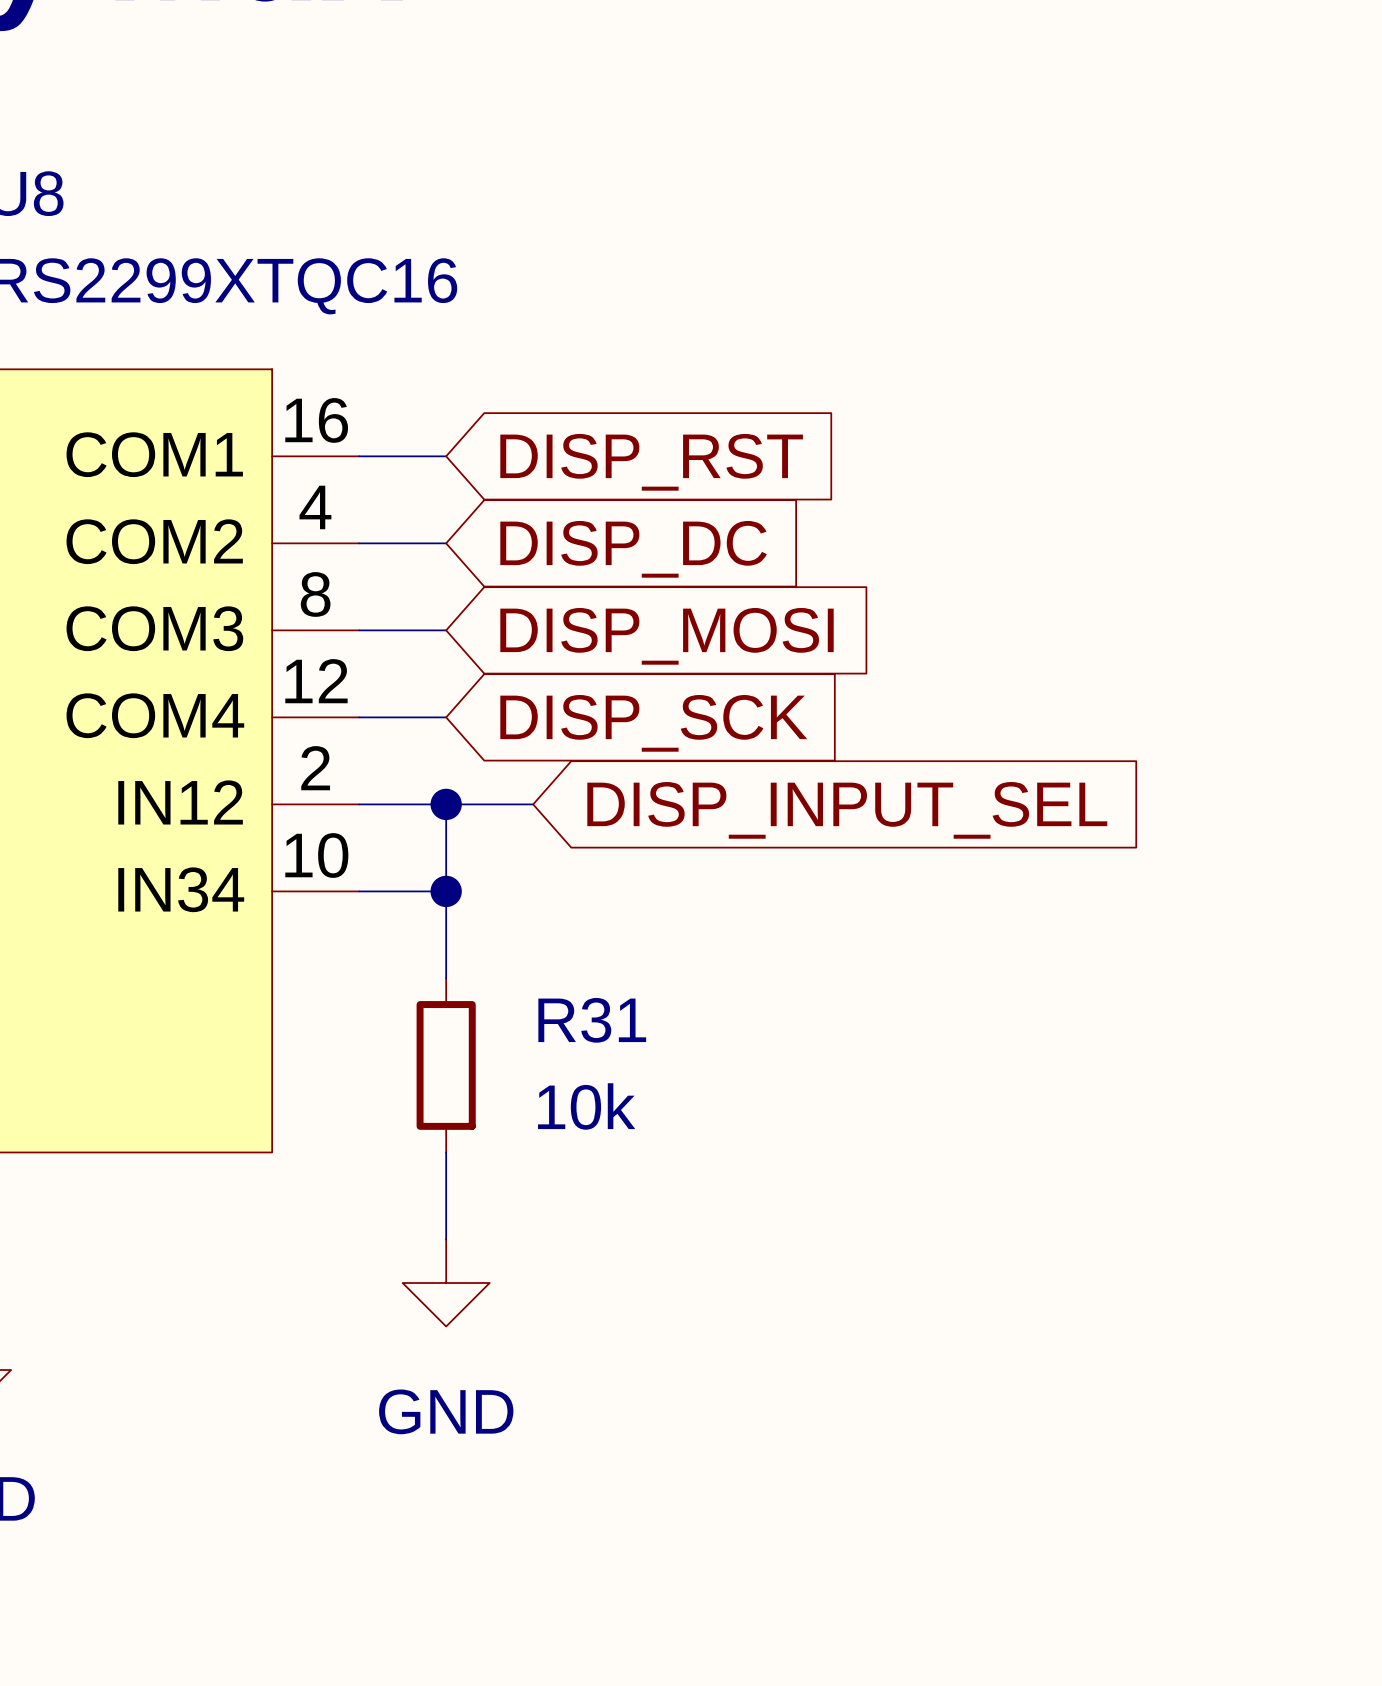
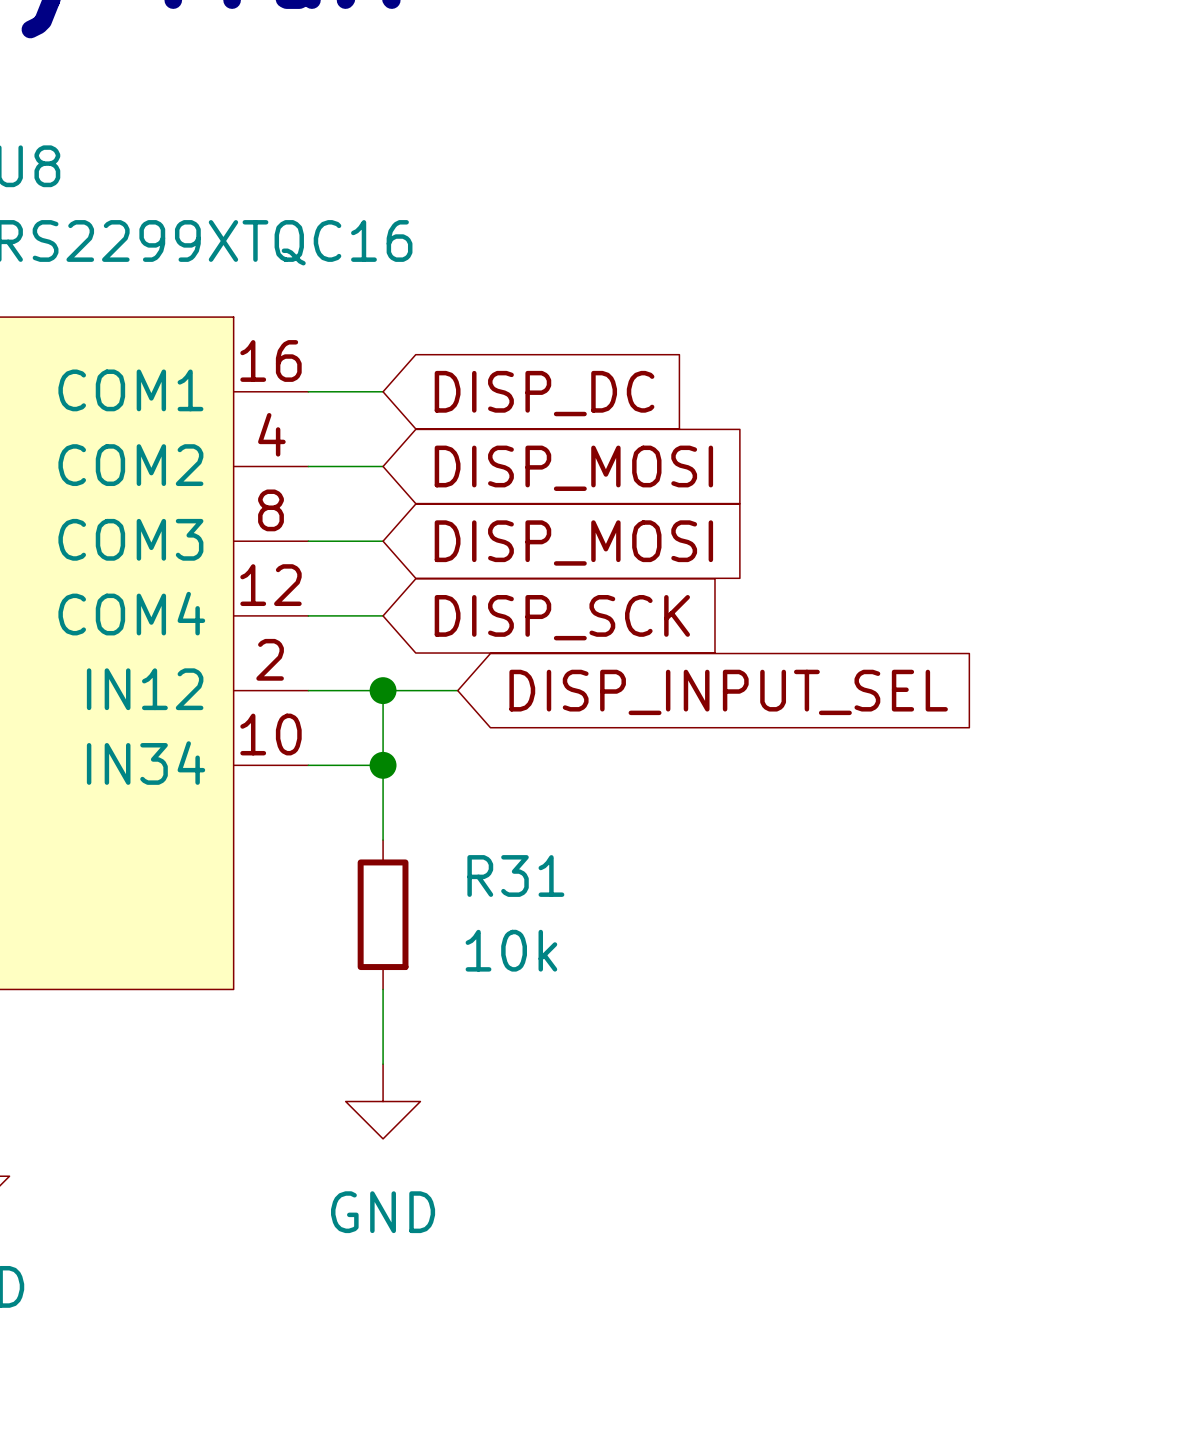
global label: DISP_RST (651, 462) -> DISP_DC (544, 393)
global label: DISP_DC (633, 549) -> DISP_MOSI (573, 468)

